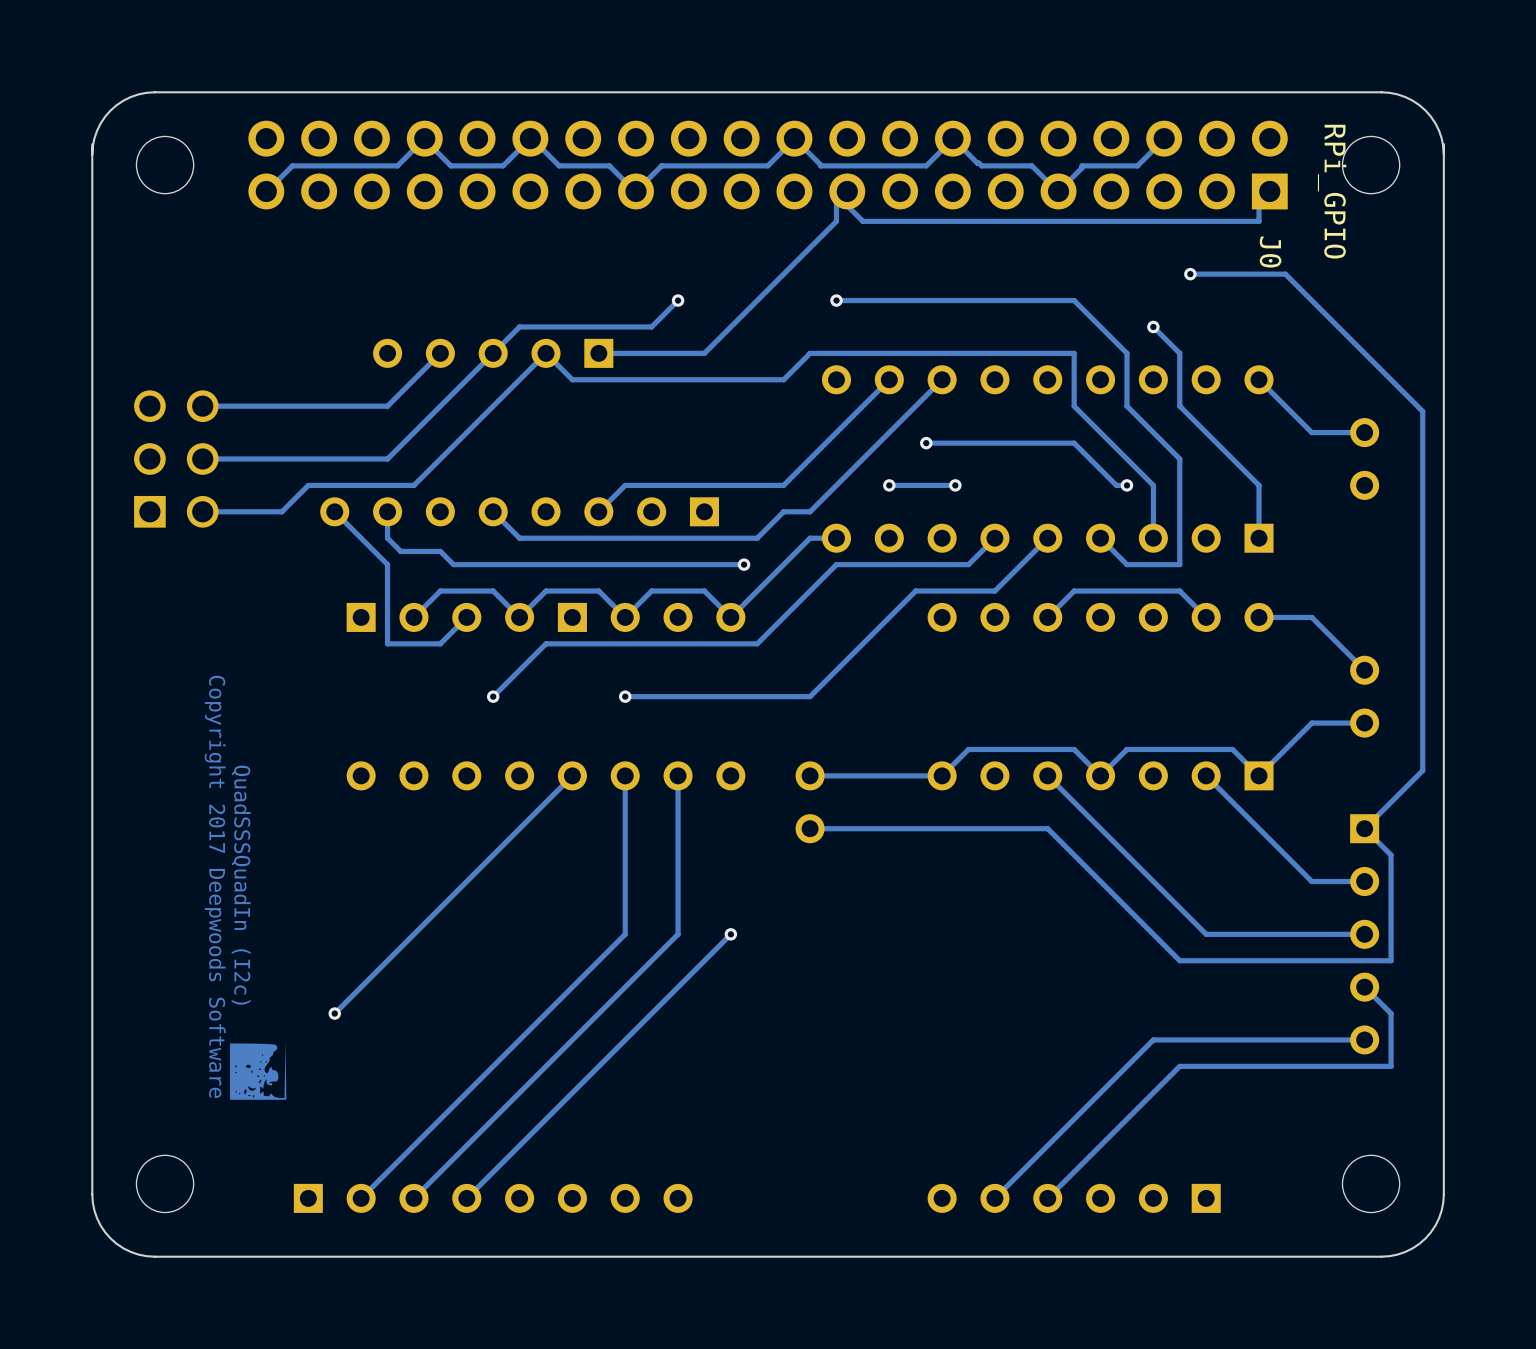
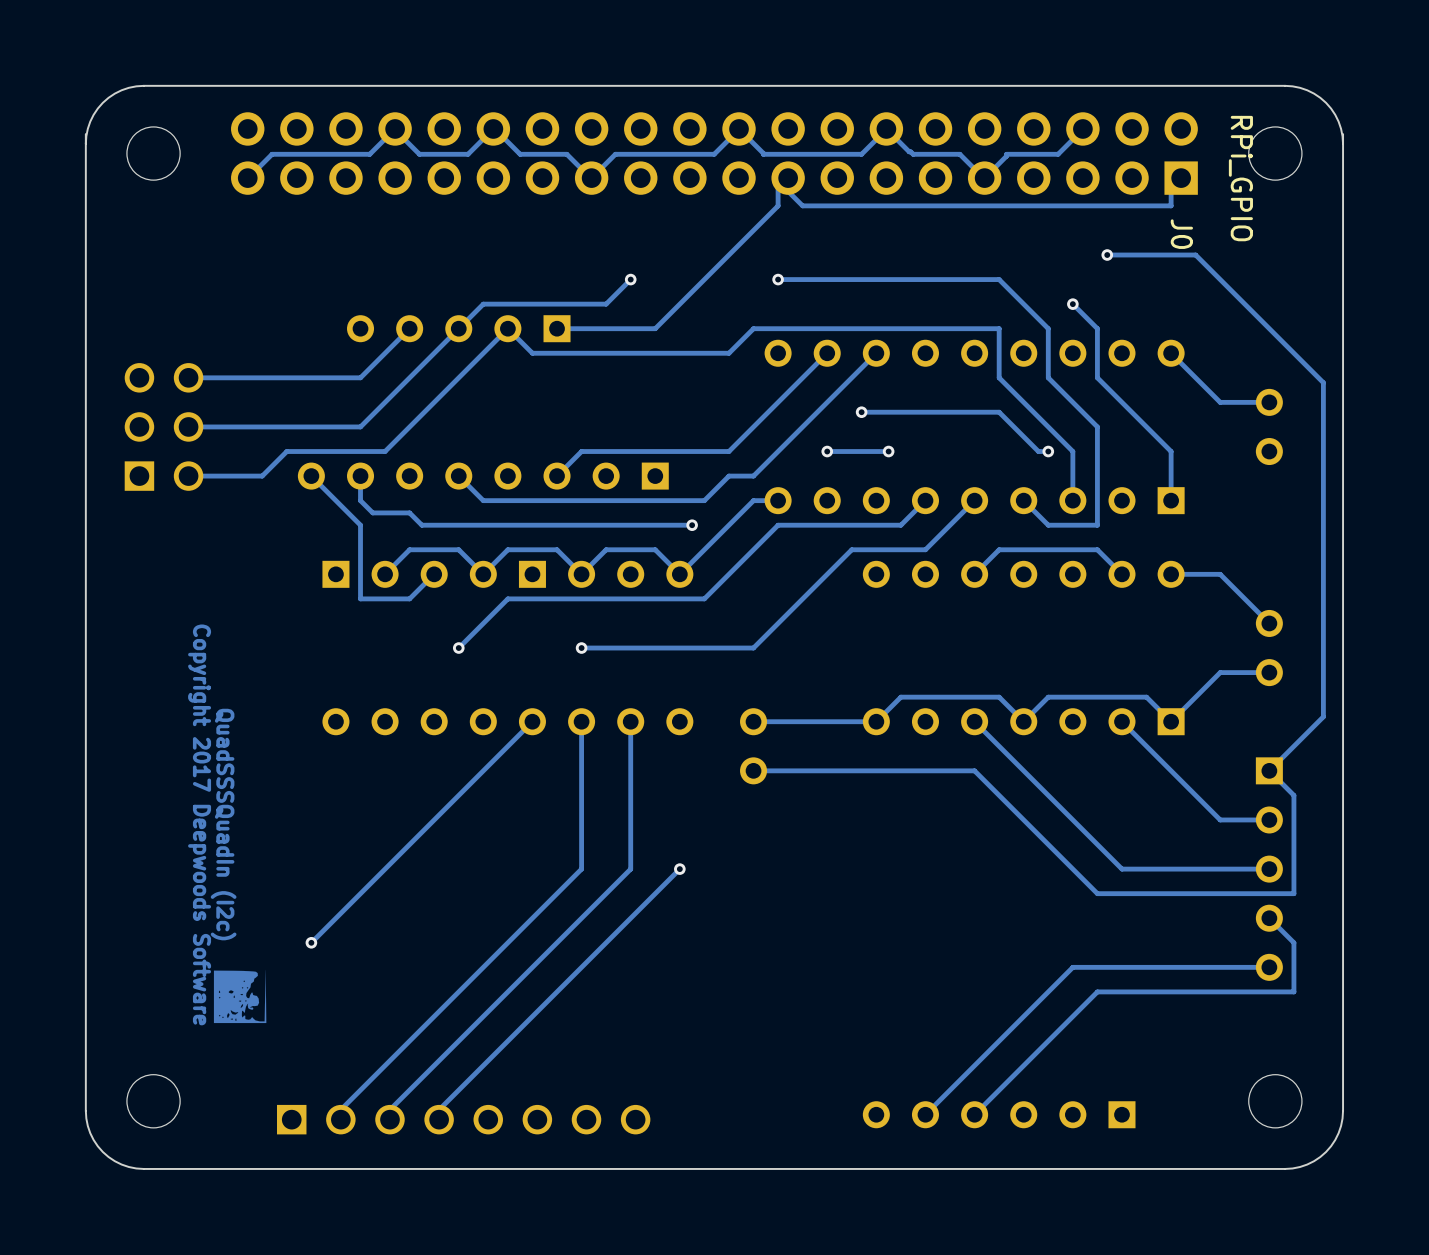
part footprint: [293, 1183, 693, 1213] -> [276, 1104, 651, 1135]

